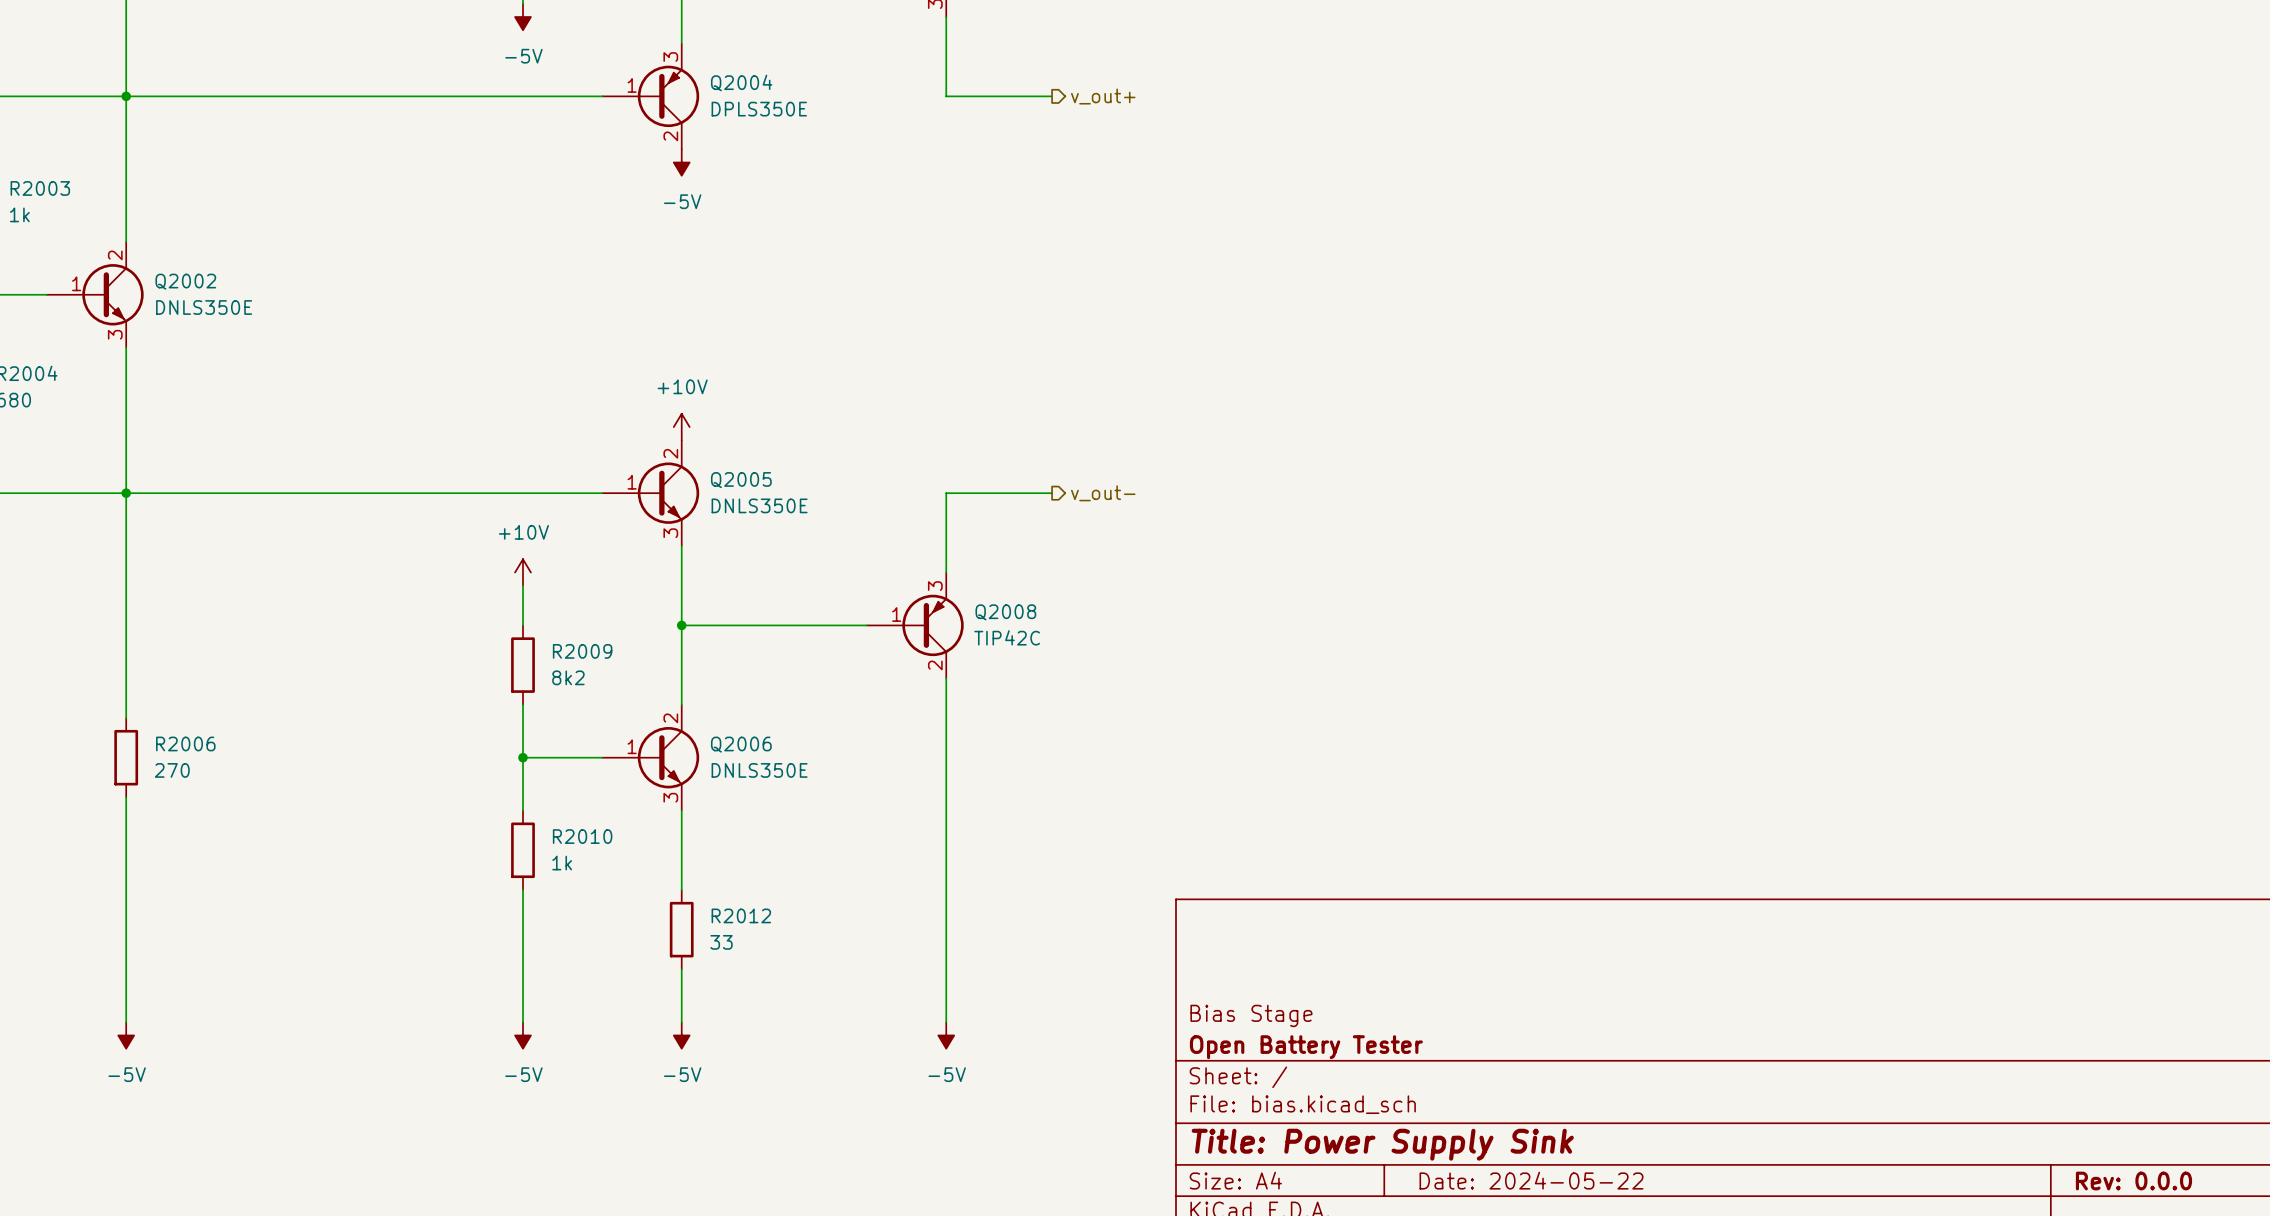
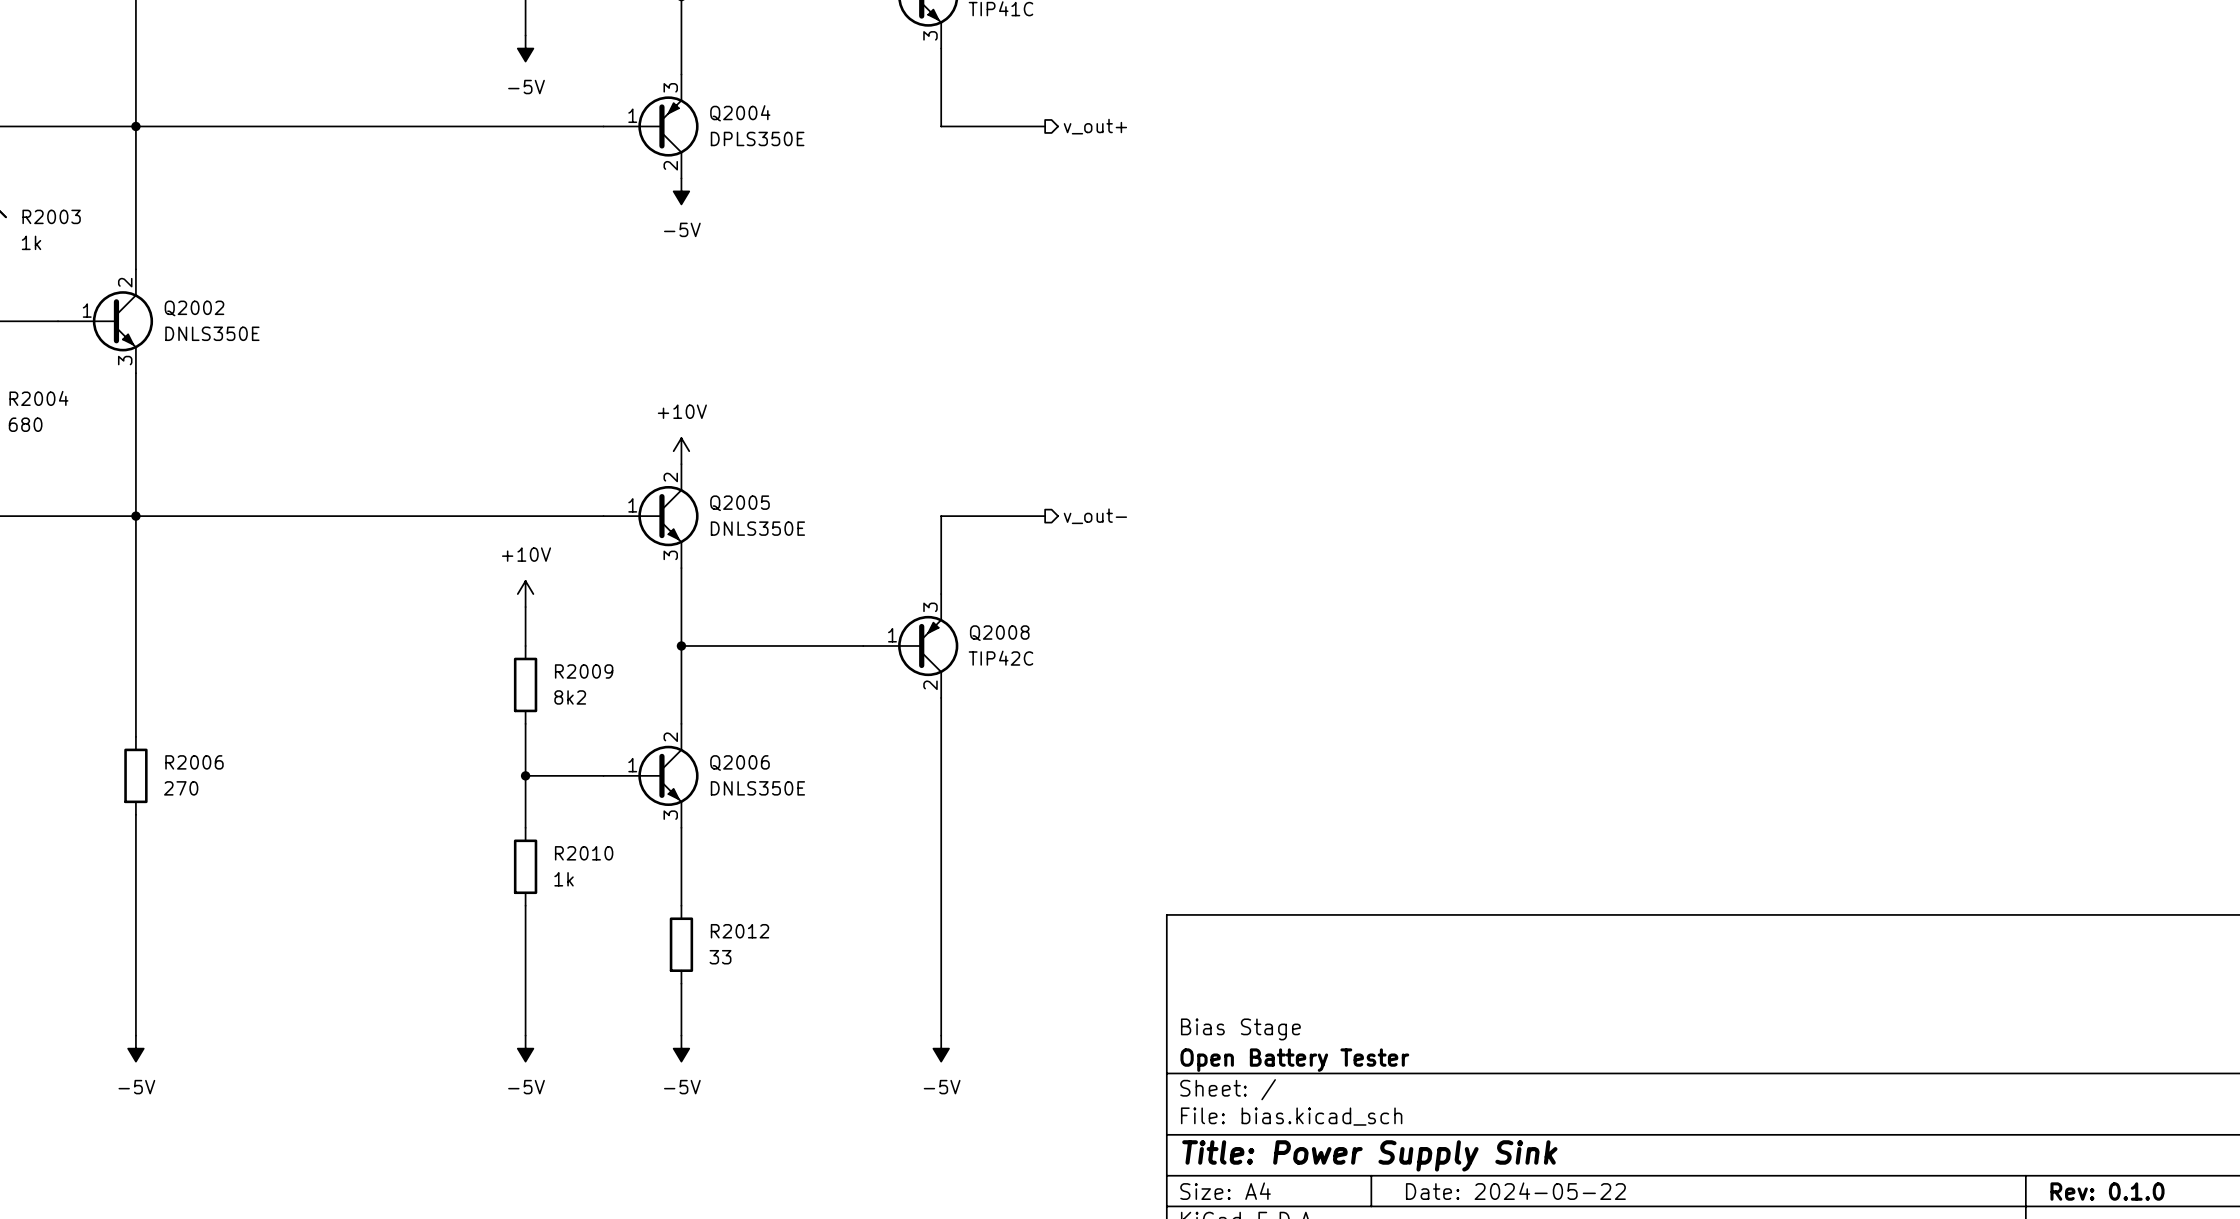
title block: Rev: 0.0.0 (2133, 1180) -> Rev: 0.1.0 (2107, 1191)

